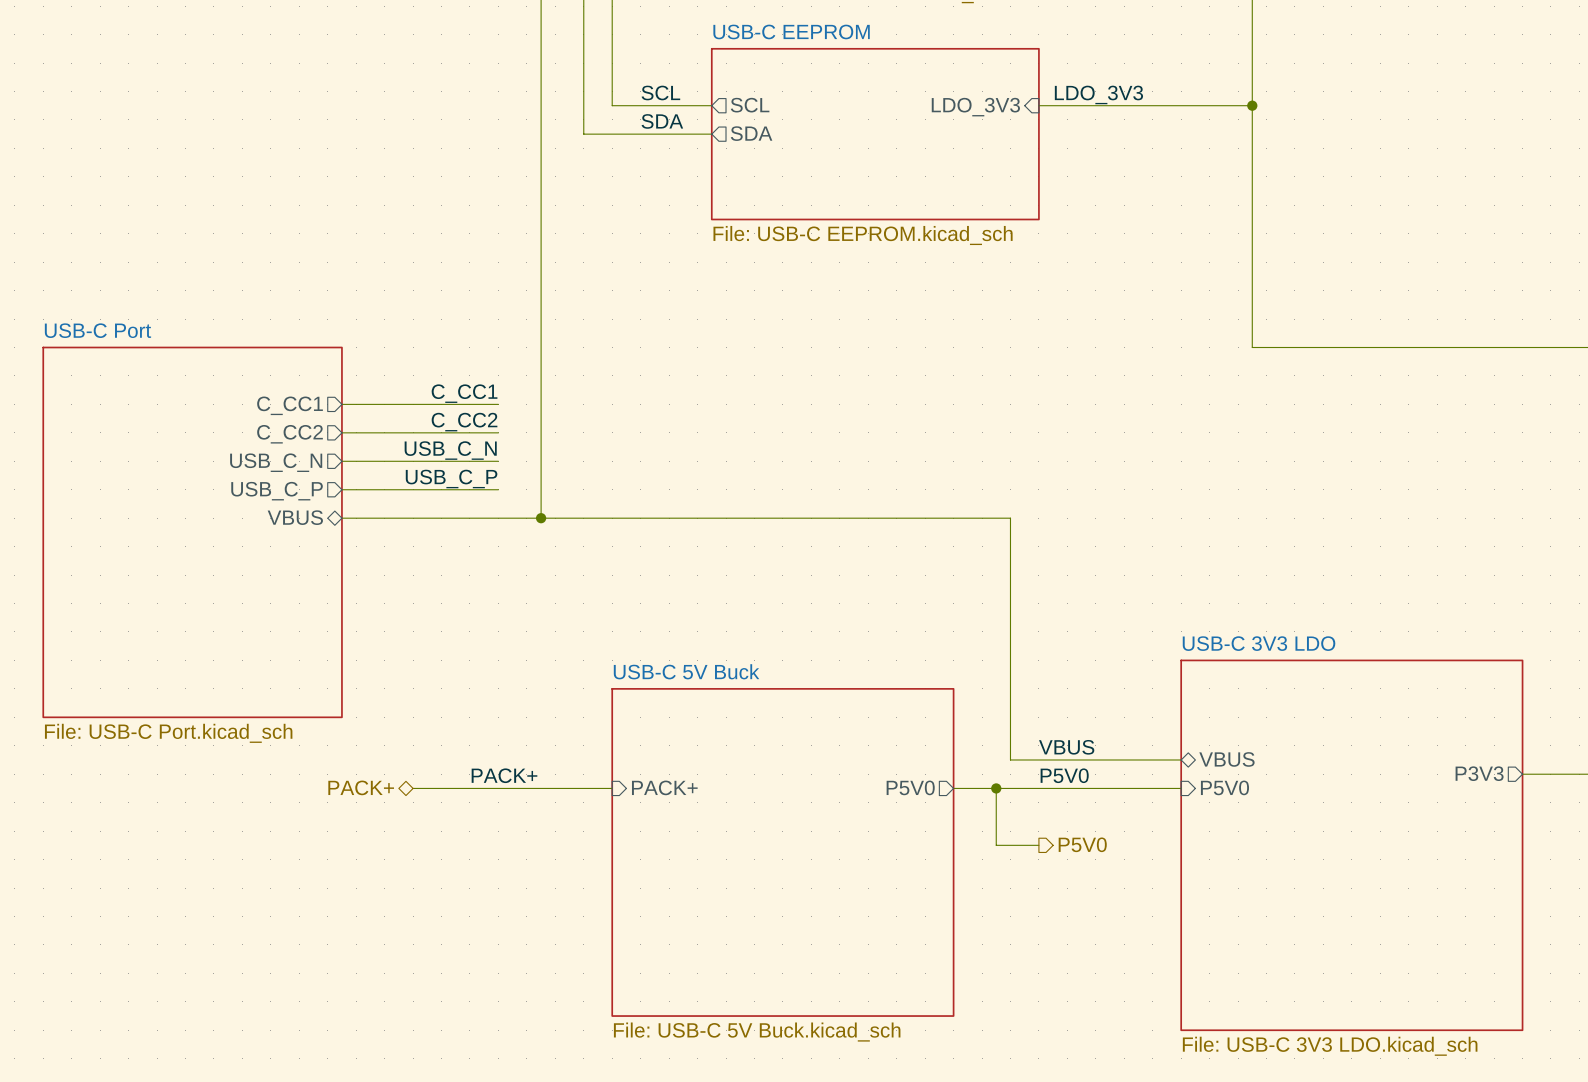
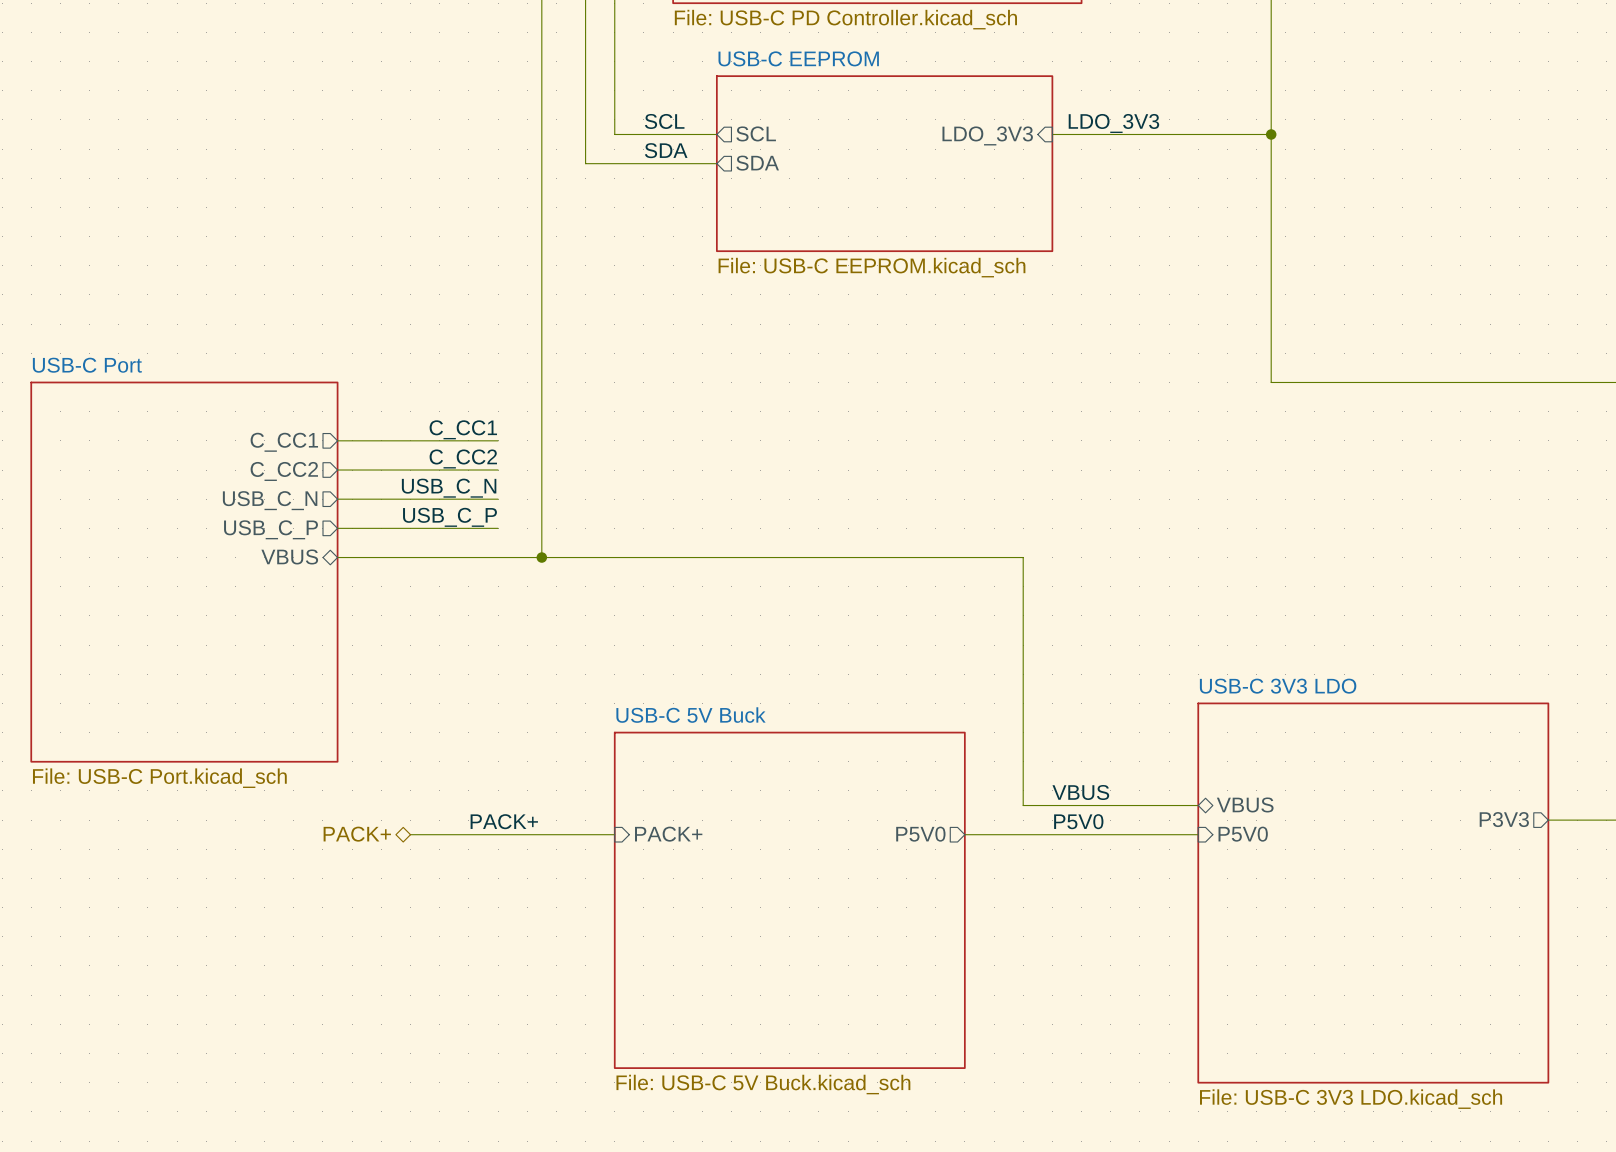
wire: (996, 788) (996, 845) (1038, 845) -> none
junction: (996, 788) -> none
hierarchical label: P5V0 (1082, 844) -> none

